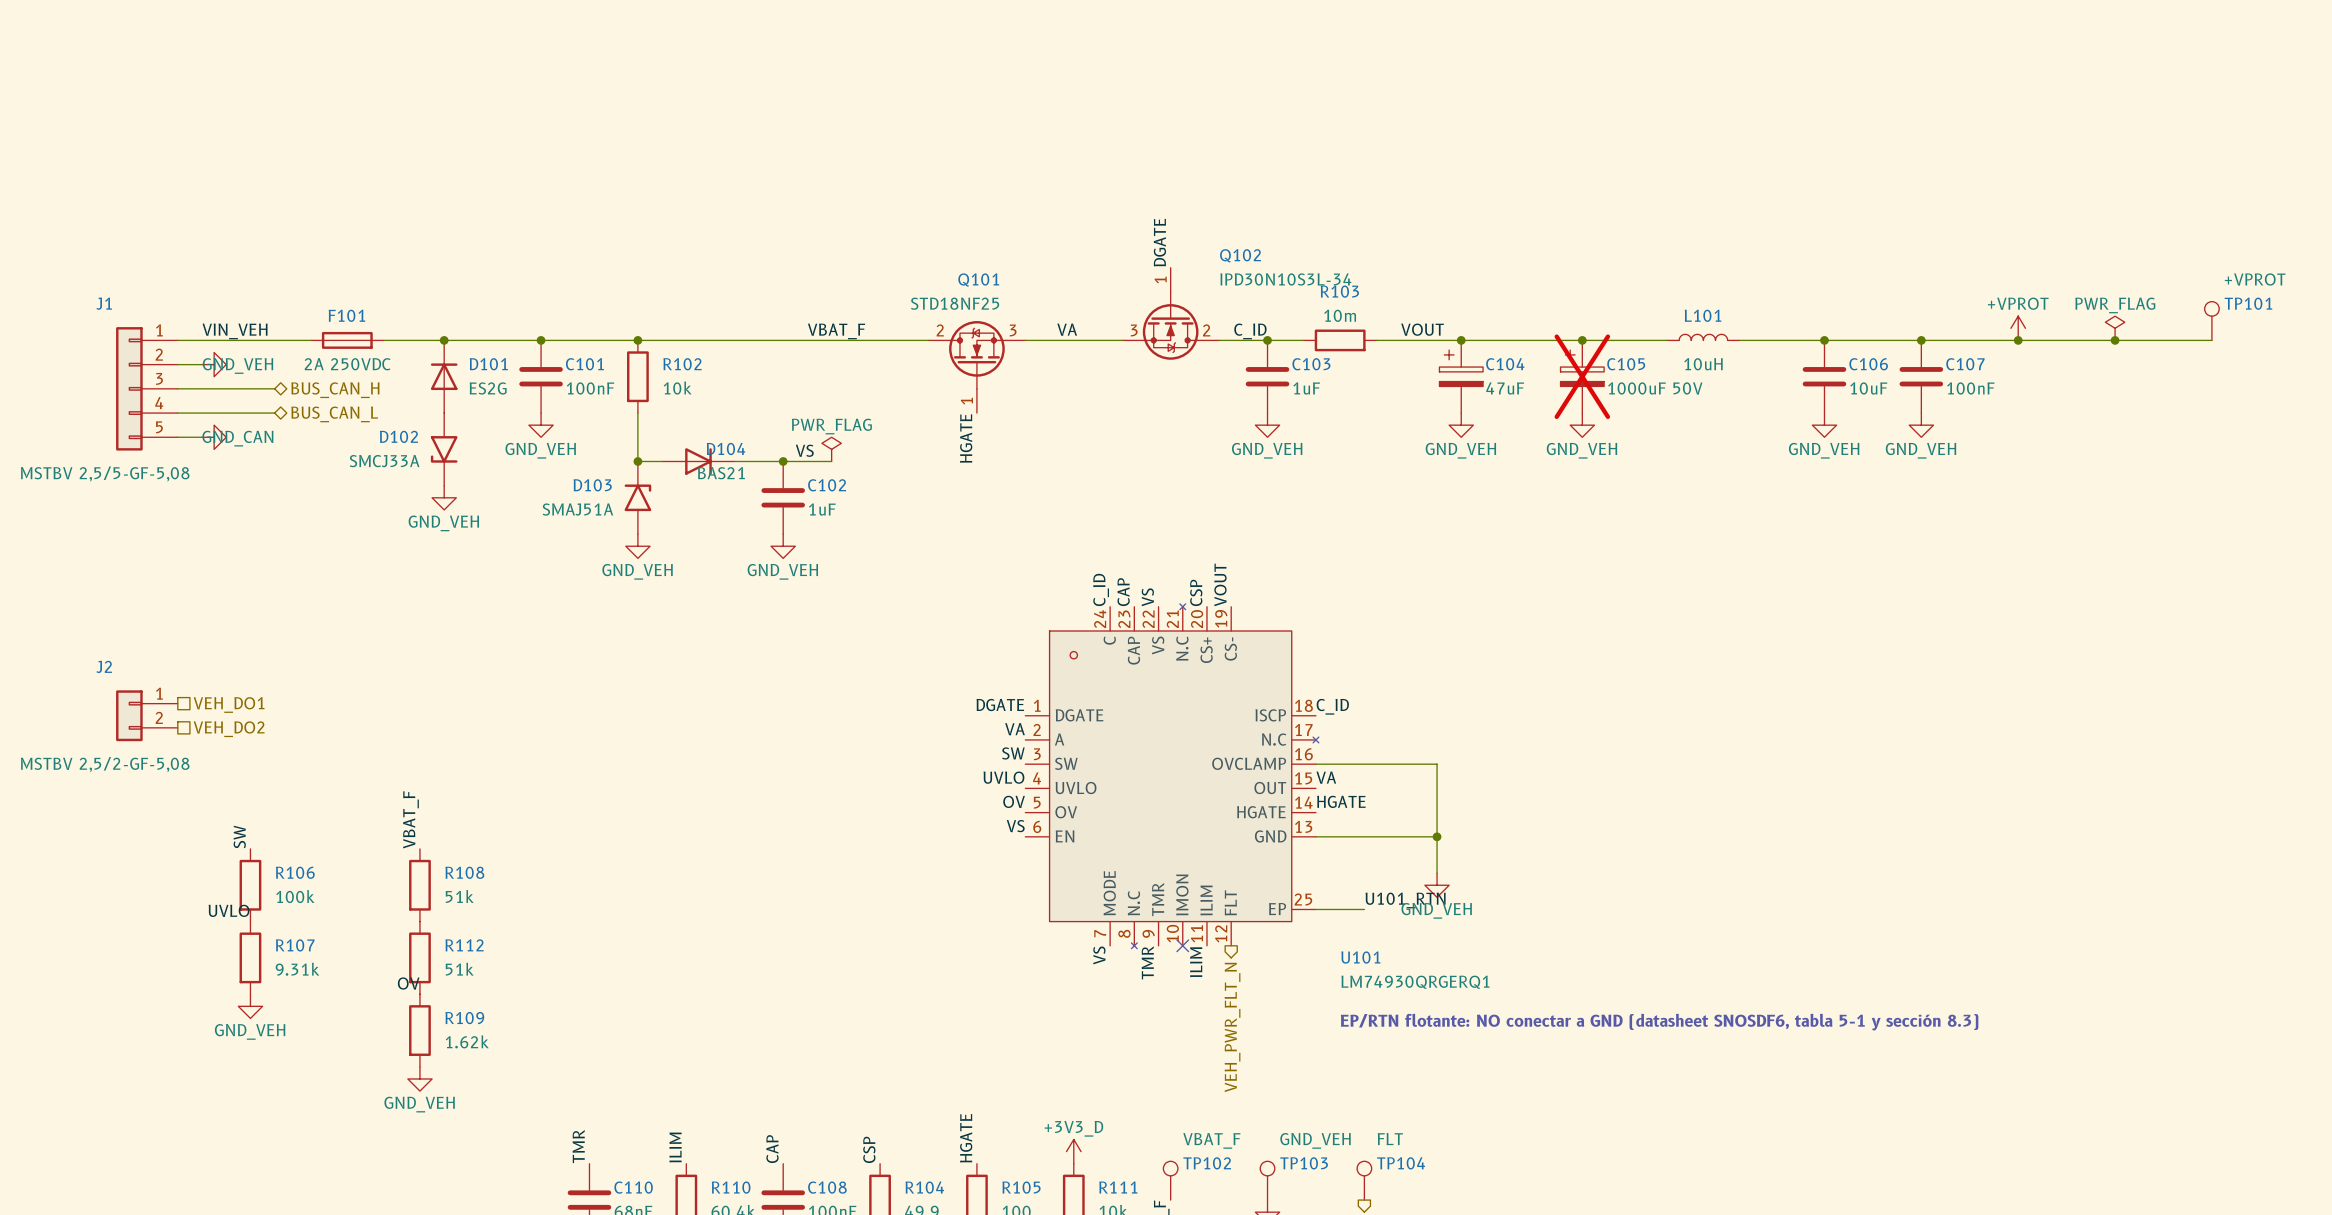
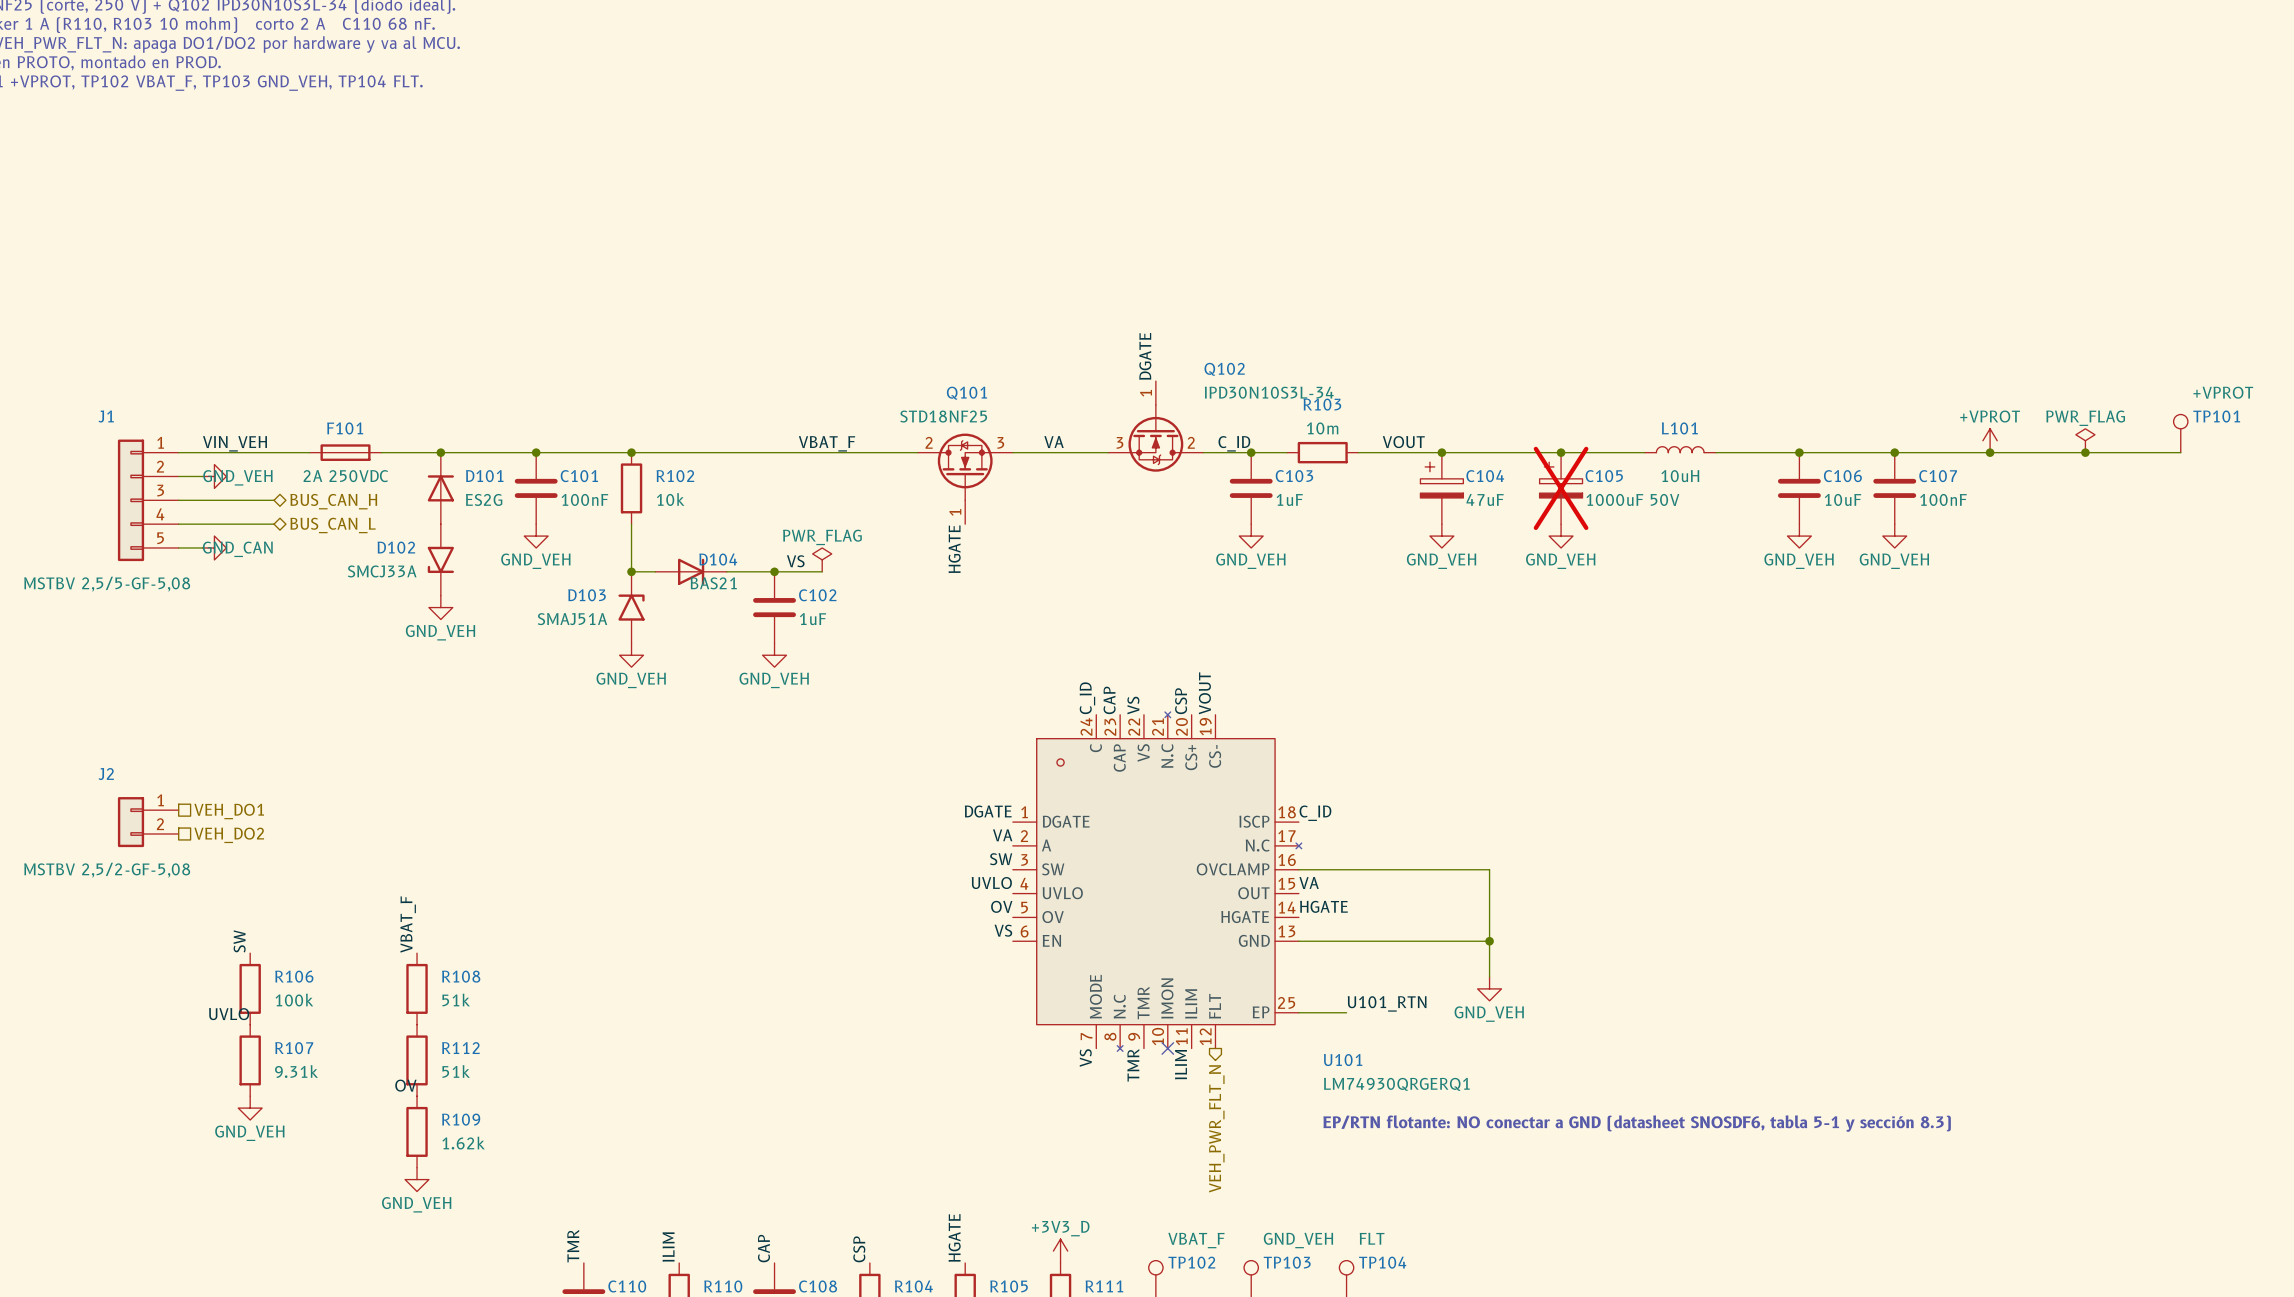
wire: (1437, 764) (1437, 873) -> (1418, 869) (1489, 869) (1489, 977)
wire: none -> (1418, 941) (1489, 941)
junction: (1437, 836) -> none
junction: none -> (1489, 941)
power symbol position: GND_VEH (1437, 885) -> GND_VEH (1489, 988)

